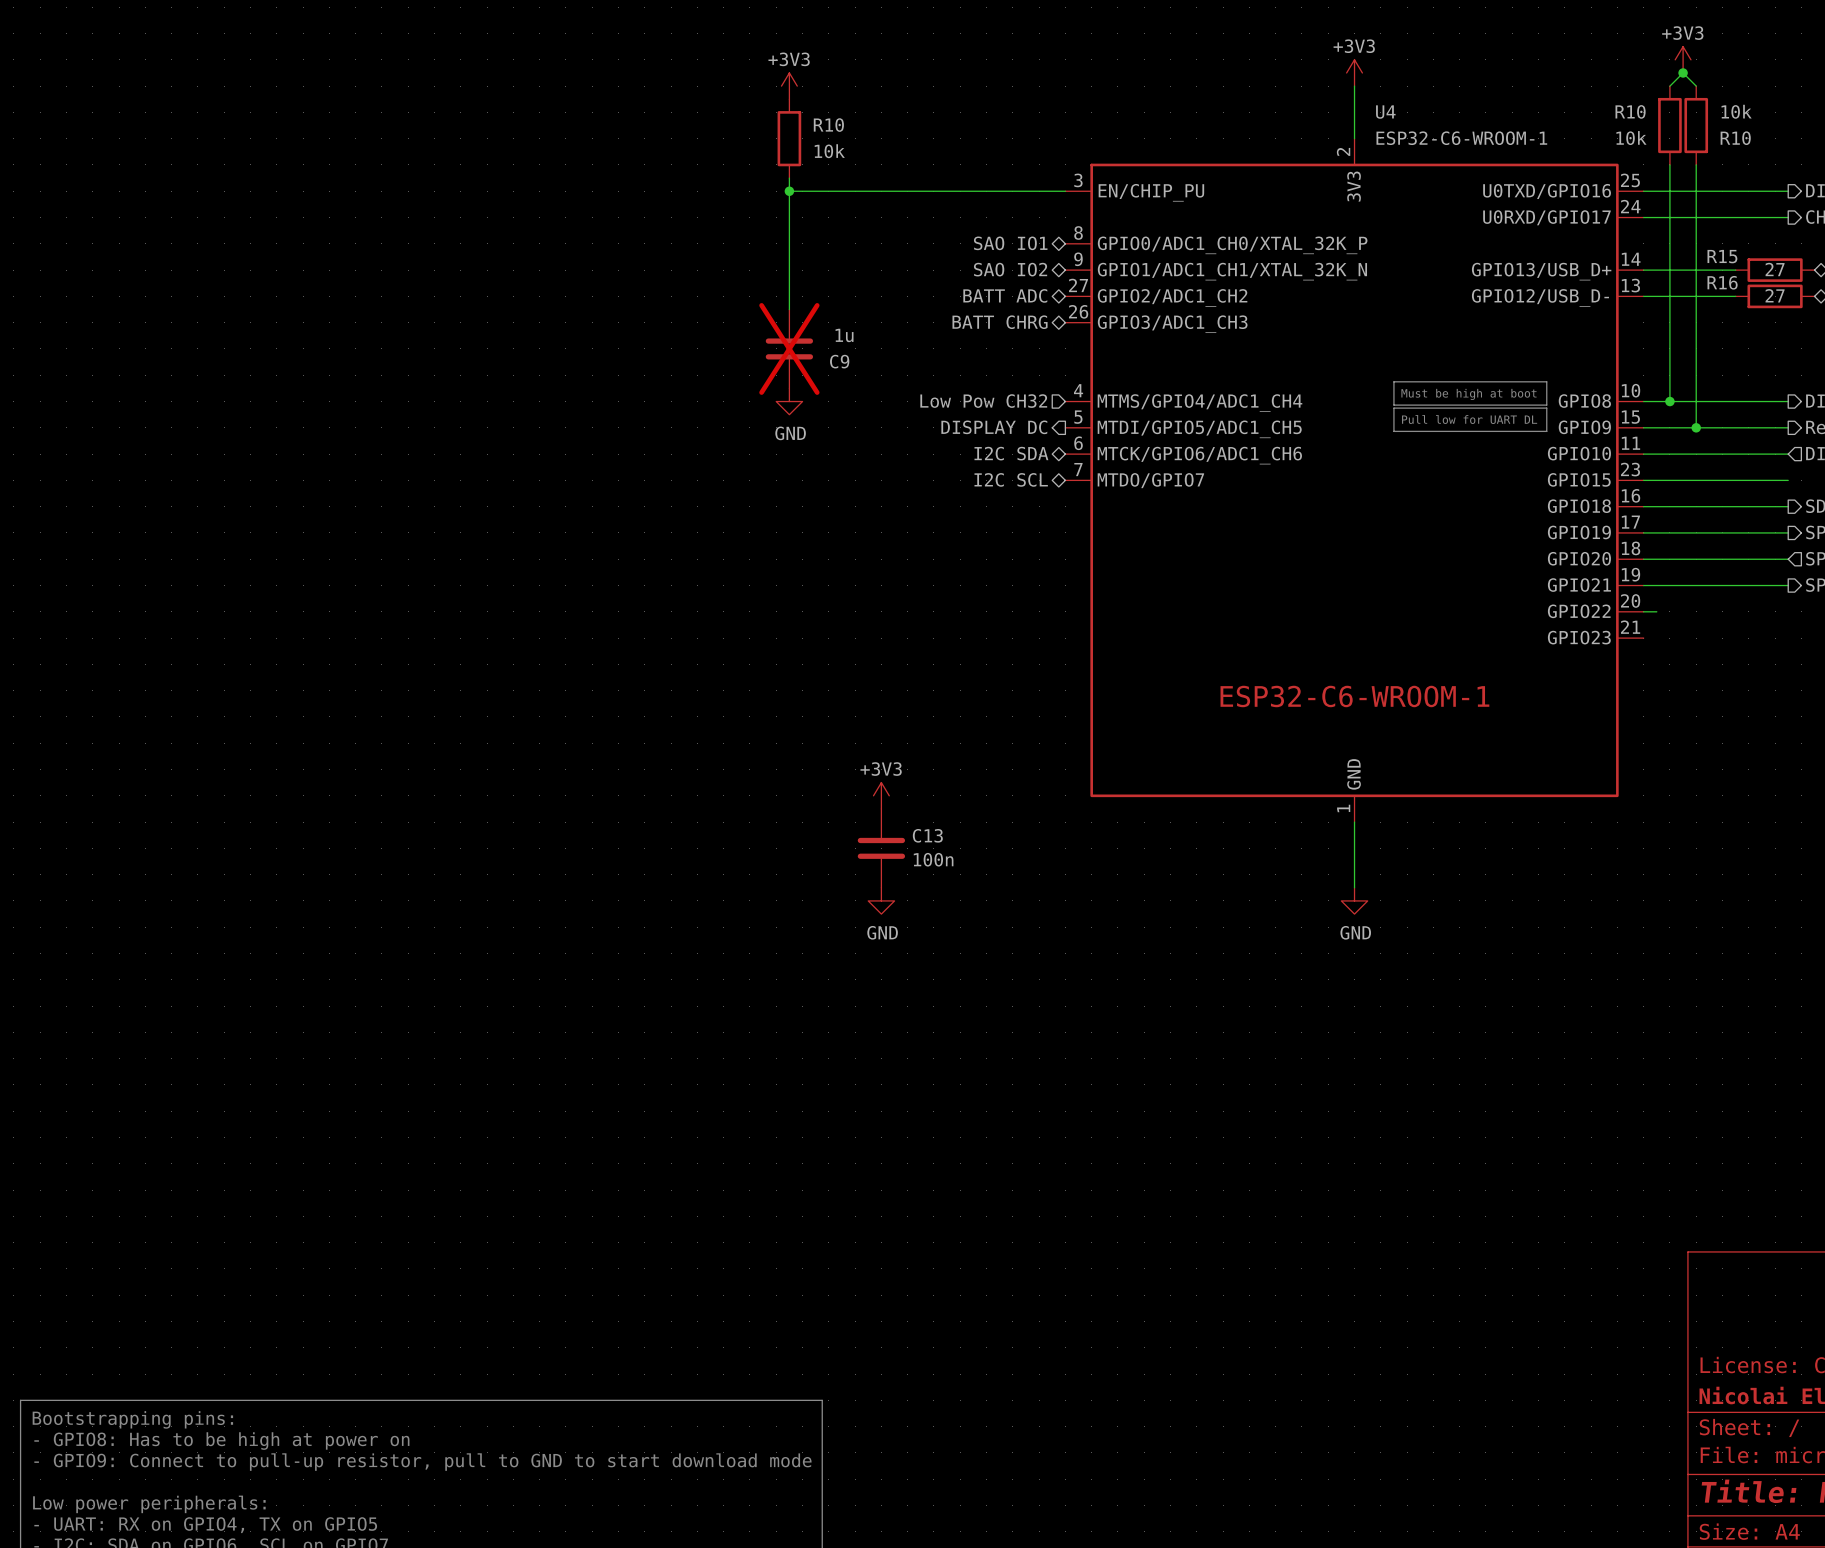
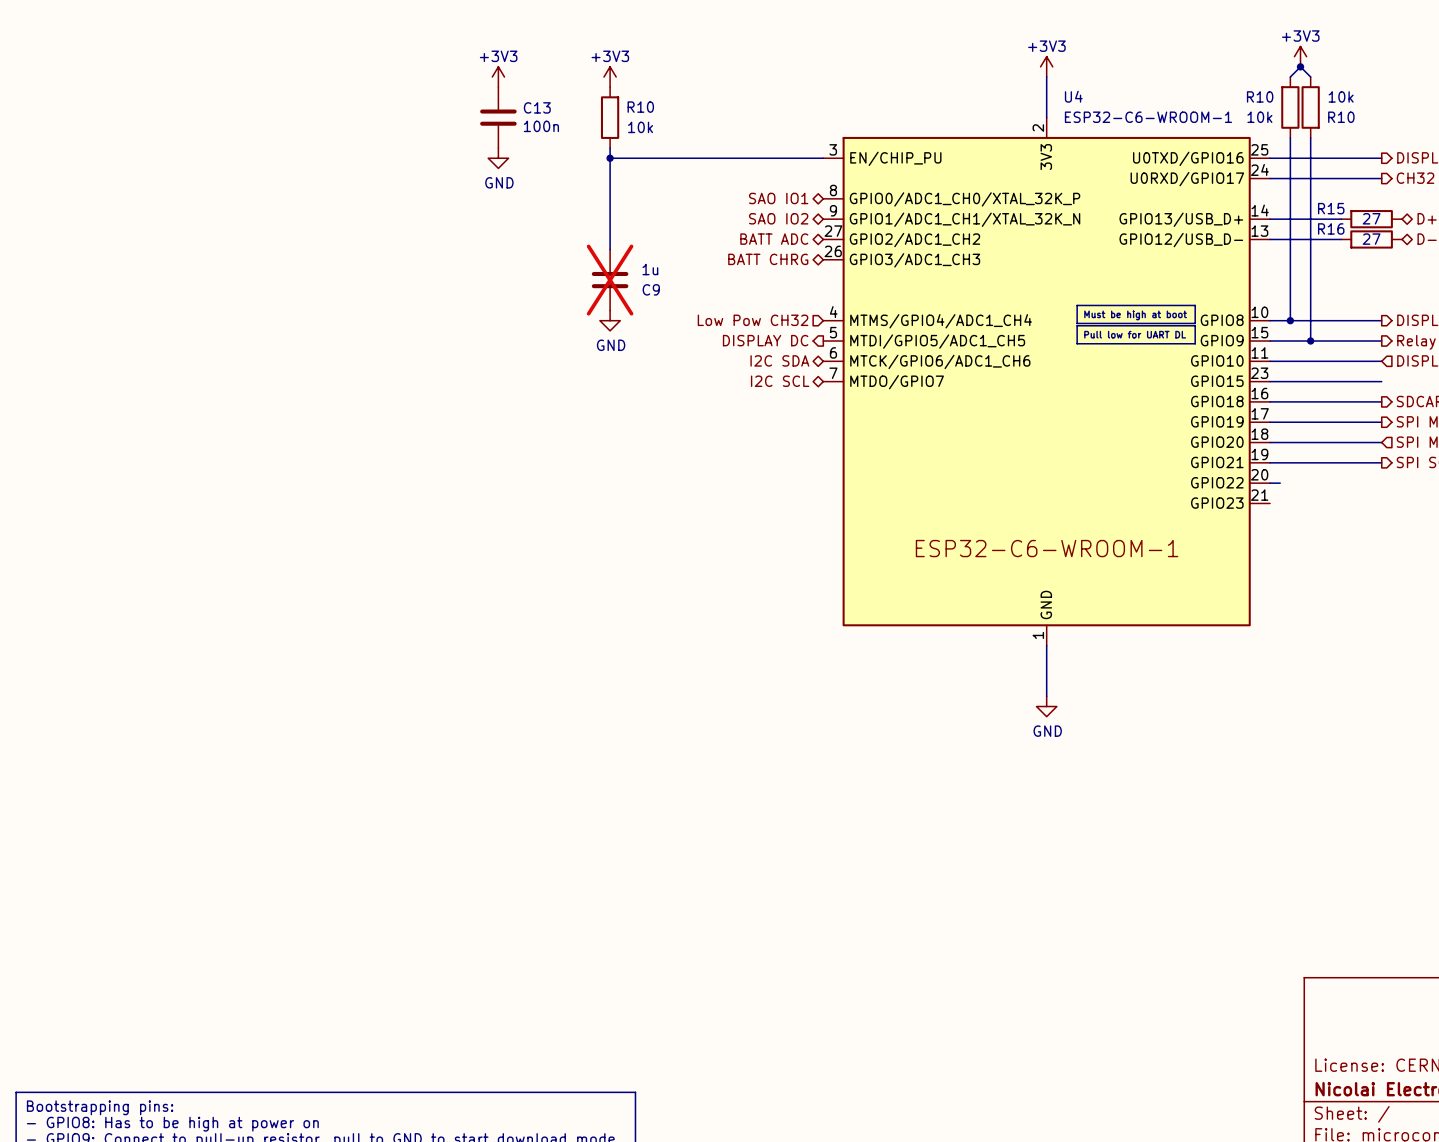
power symbol: none -> +3V3 (498, 77)
power symbol: none -> GND (498, 158)
power symbol: +3V3 (881, 795) -> none
C13 position: (881, 848) -> (498, 117)
power symbol: GND (881, 900) -> none

